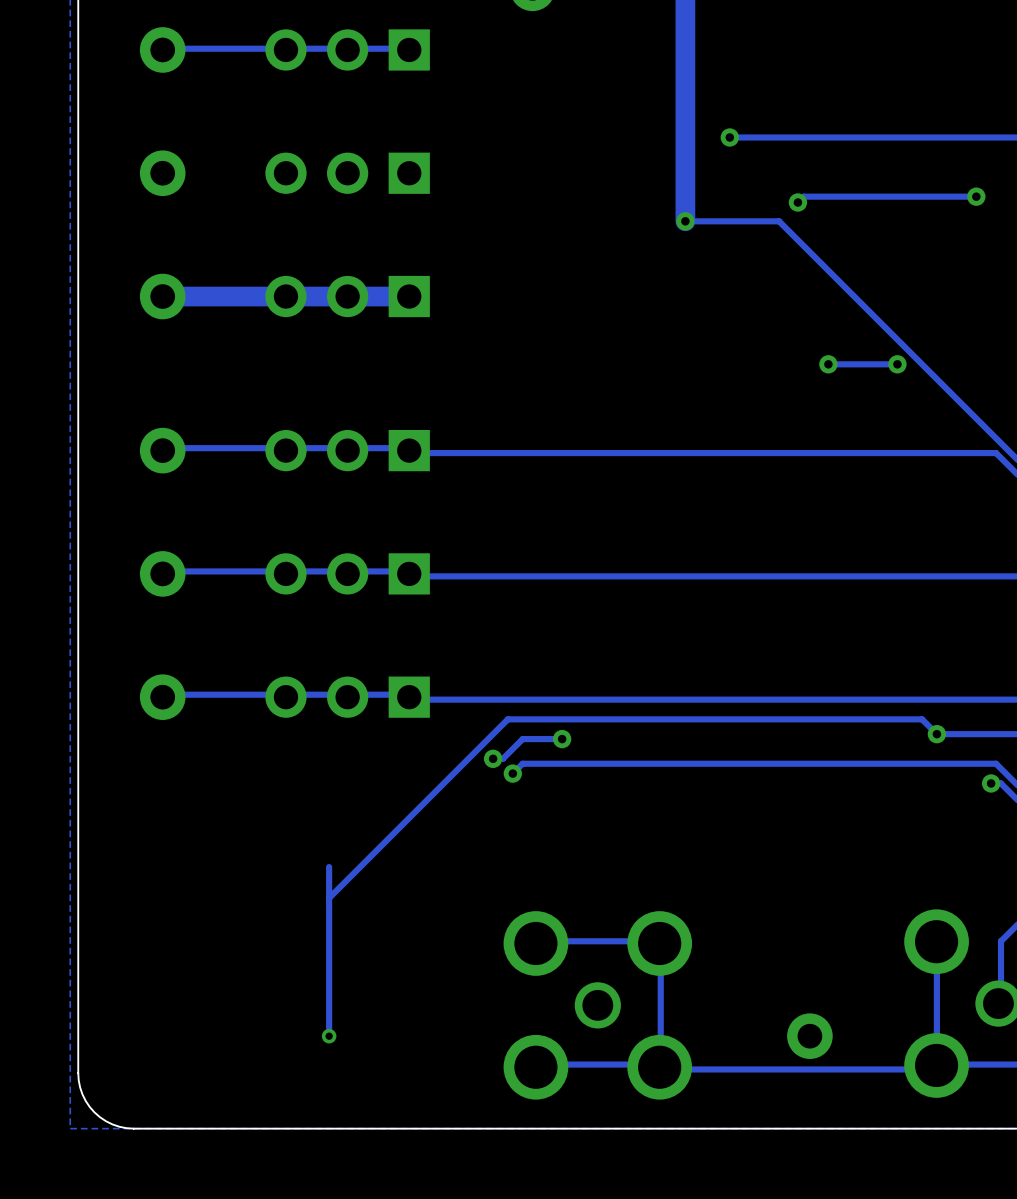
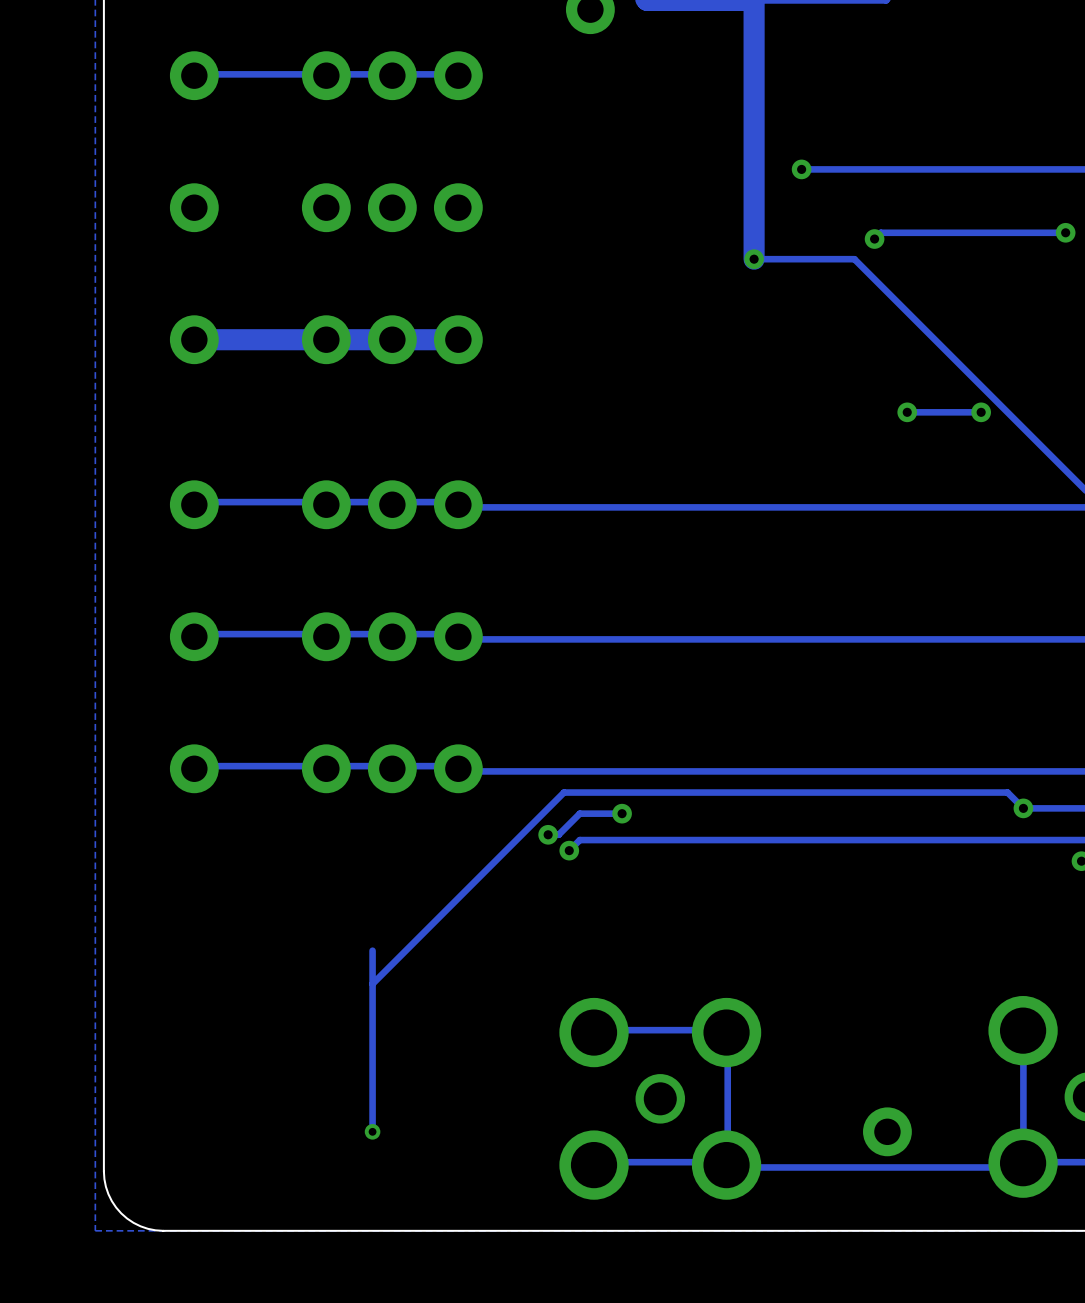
part footprint: [265, 29, 430, 71] -> [301, 51, 483, 101]
part footprint: [265, 152, 430, 194] -> [301, 183, 483, 233]
part footprint: [265, 275, 430, 318] -> [301, 315, 483, 365]
part footprint: [265, 429, 430, 472] -> [301, 480, 483, 530]
part footprint: [265, 553, 430, 595] -> [301, 612, 483, 662]
part footprint: [265, 676, 430, 718] -> [301, 744, 483, 794]

